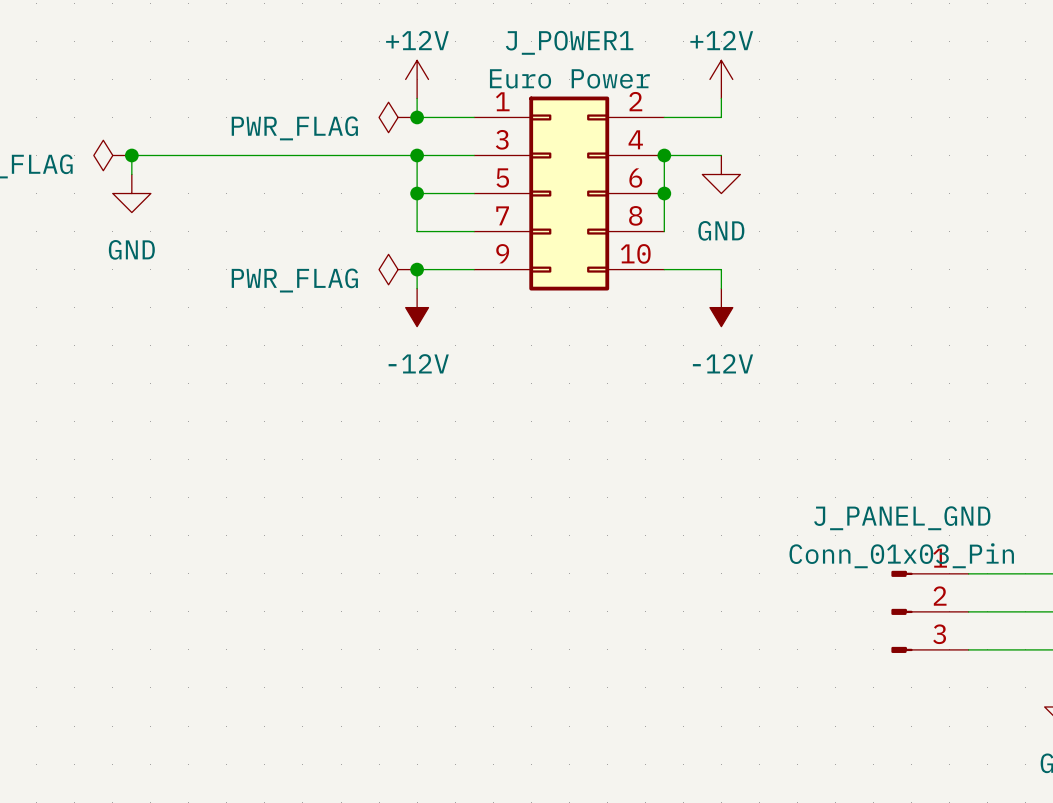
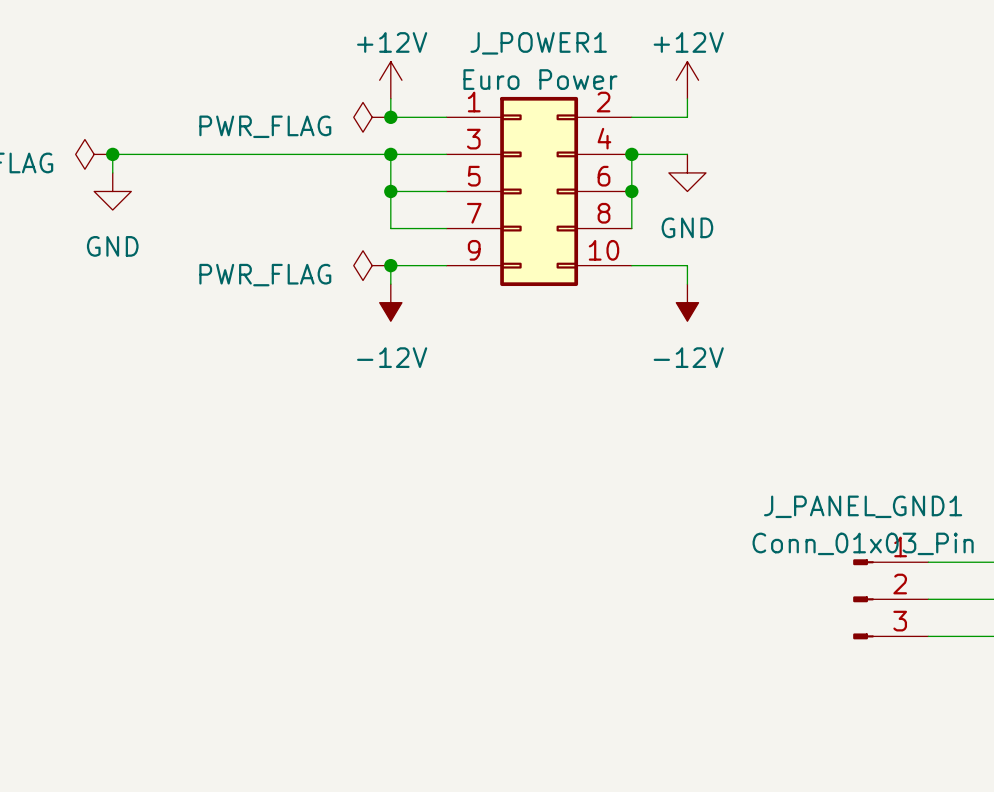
J_PANEL_GND name: J_PANEL_GND (902, 518) -> J_PANEL_GND1 (863, 506)

